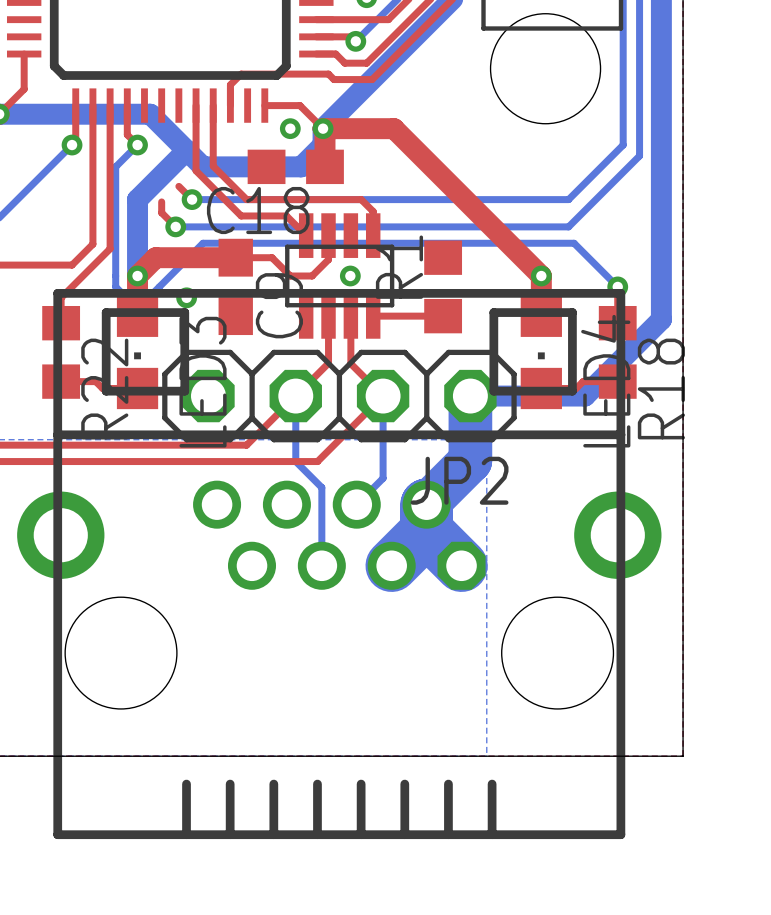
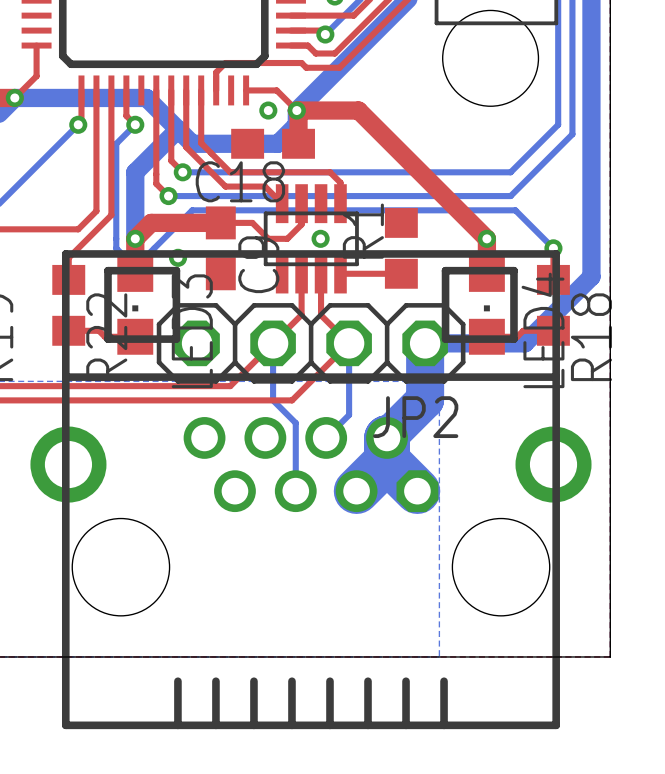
top track: none -> (156, 90) (156, 174)
top track: none -> (171, 90) (171, 160)

